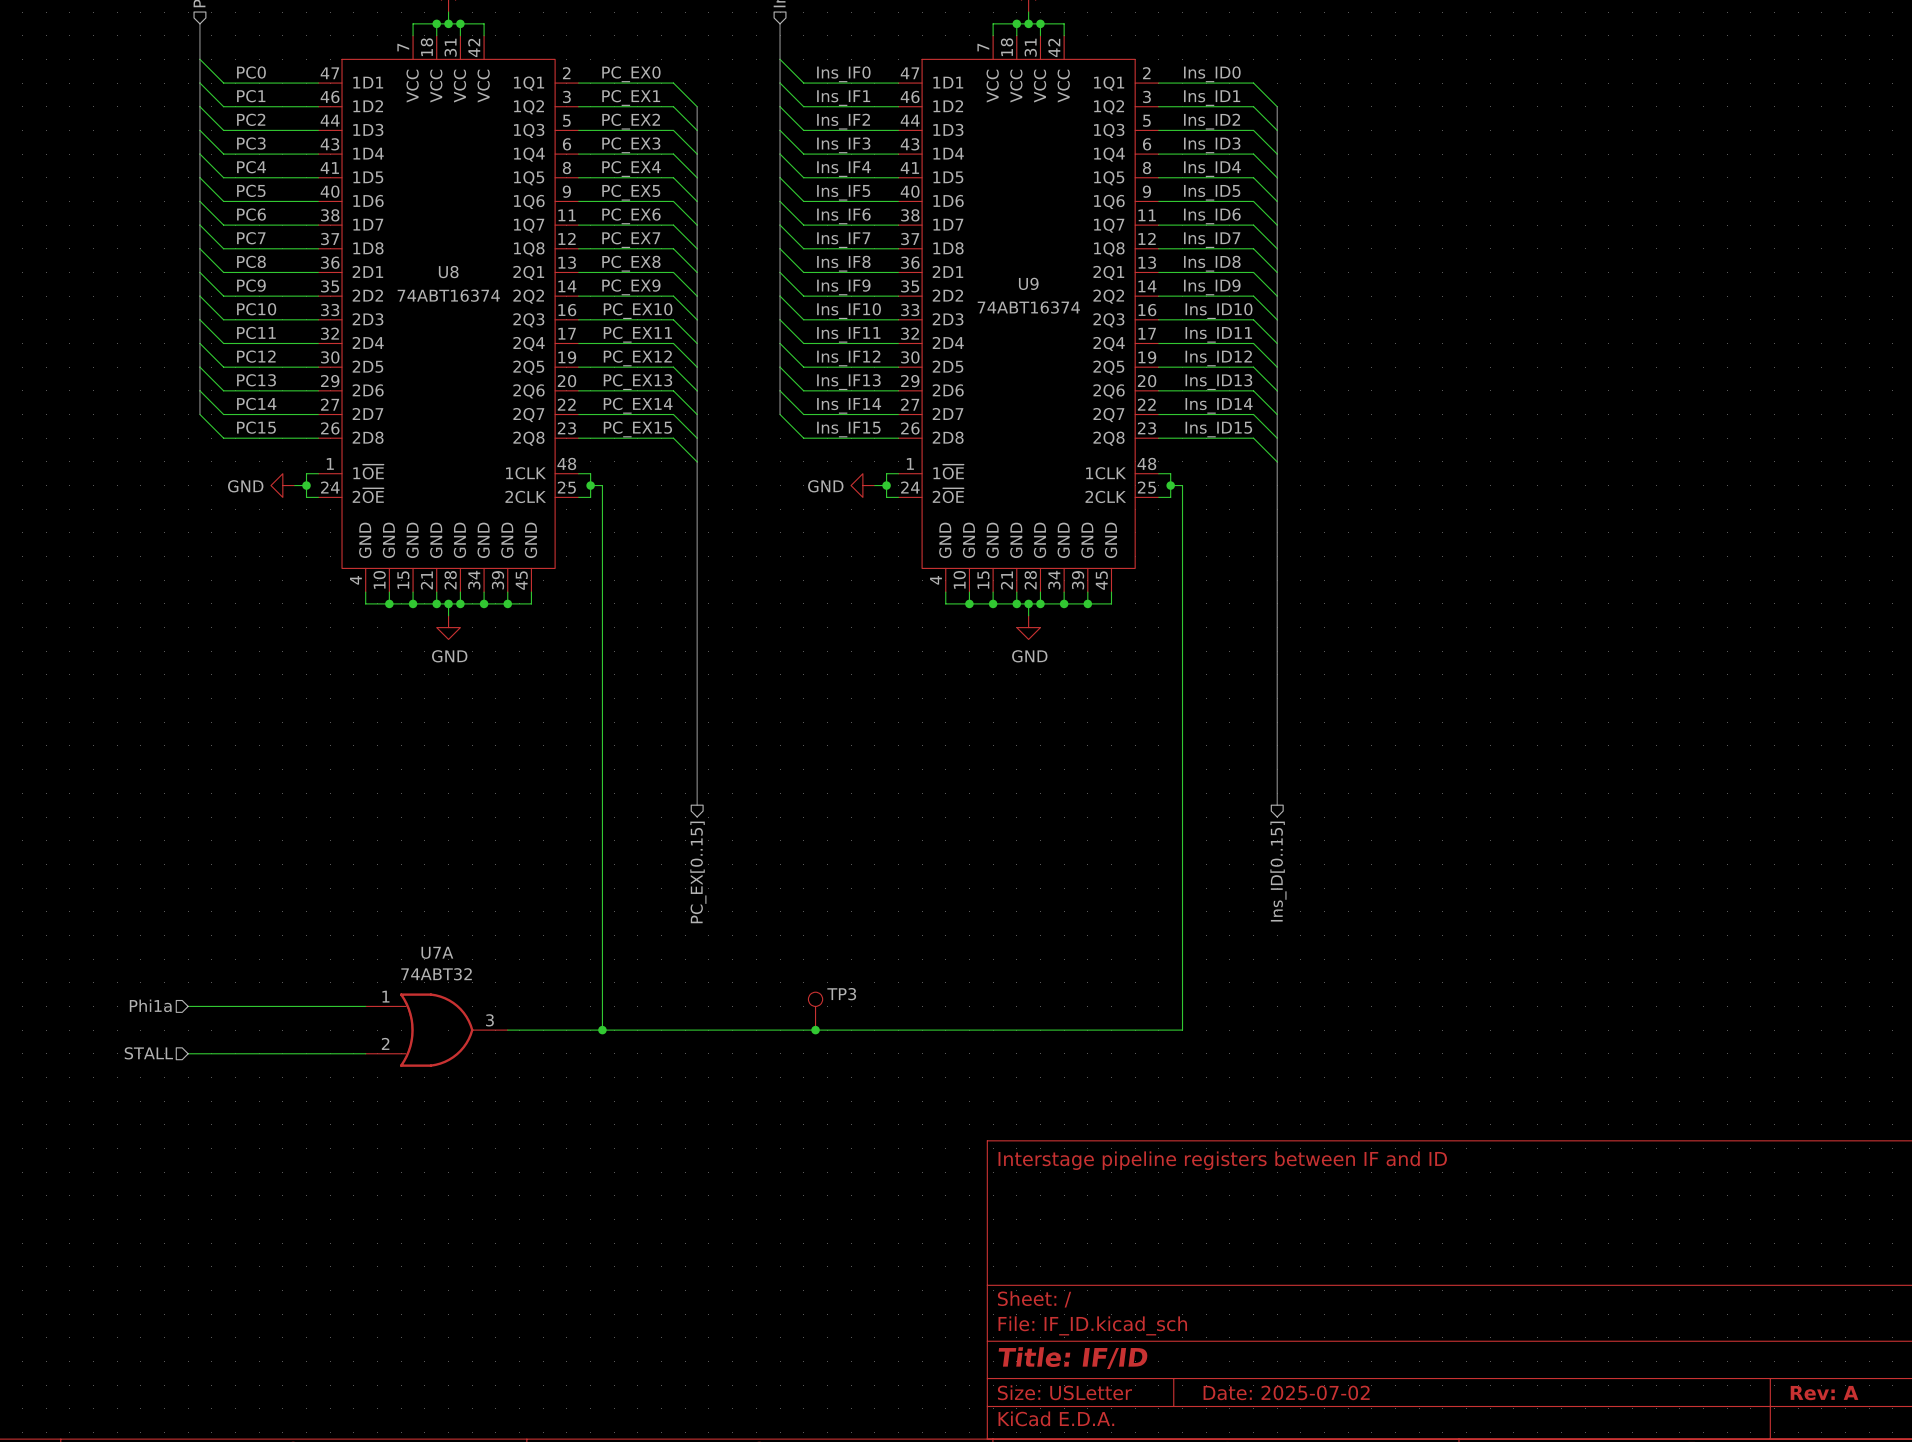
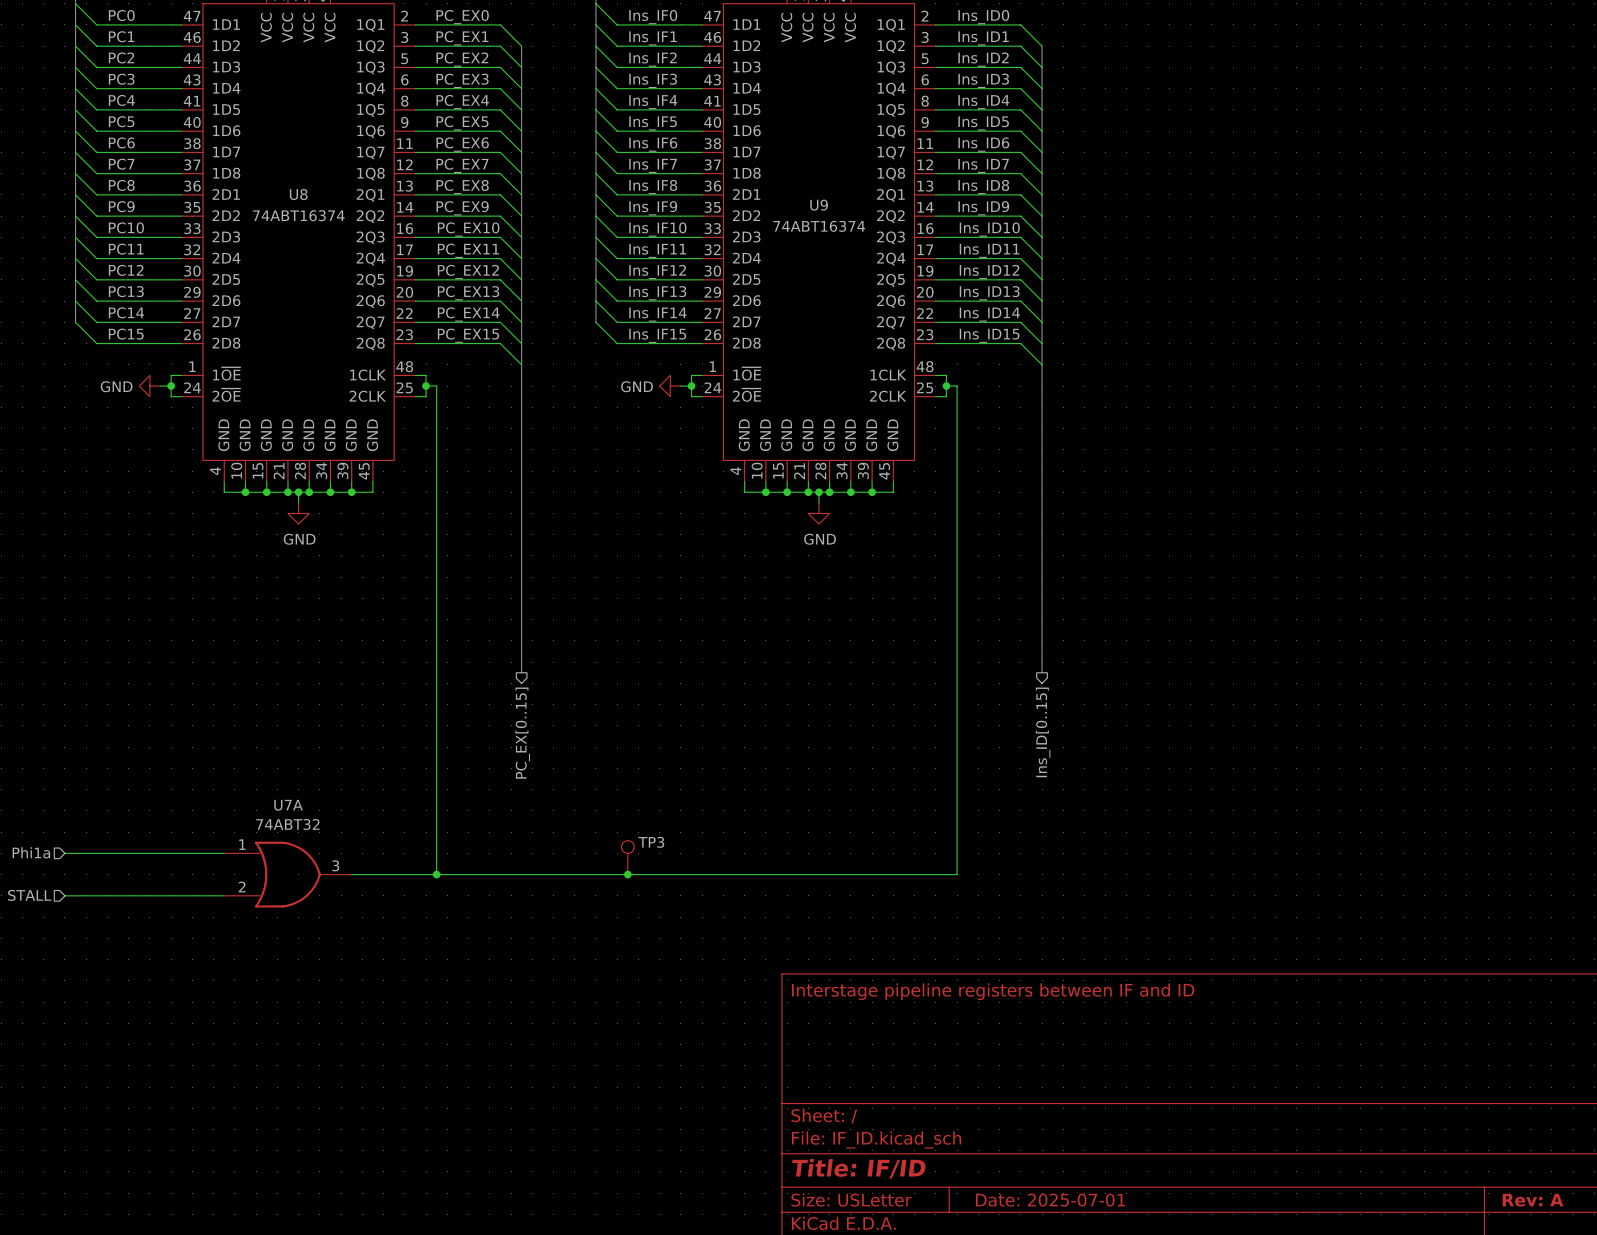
title block: Date: 2025-07-02 (1286, 1392) -> Date: 2025-07-01 (1050, 1200)

